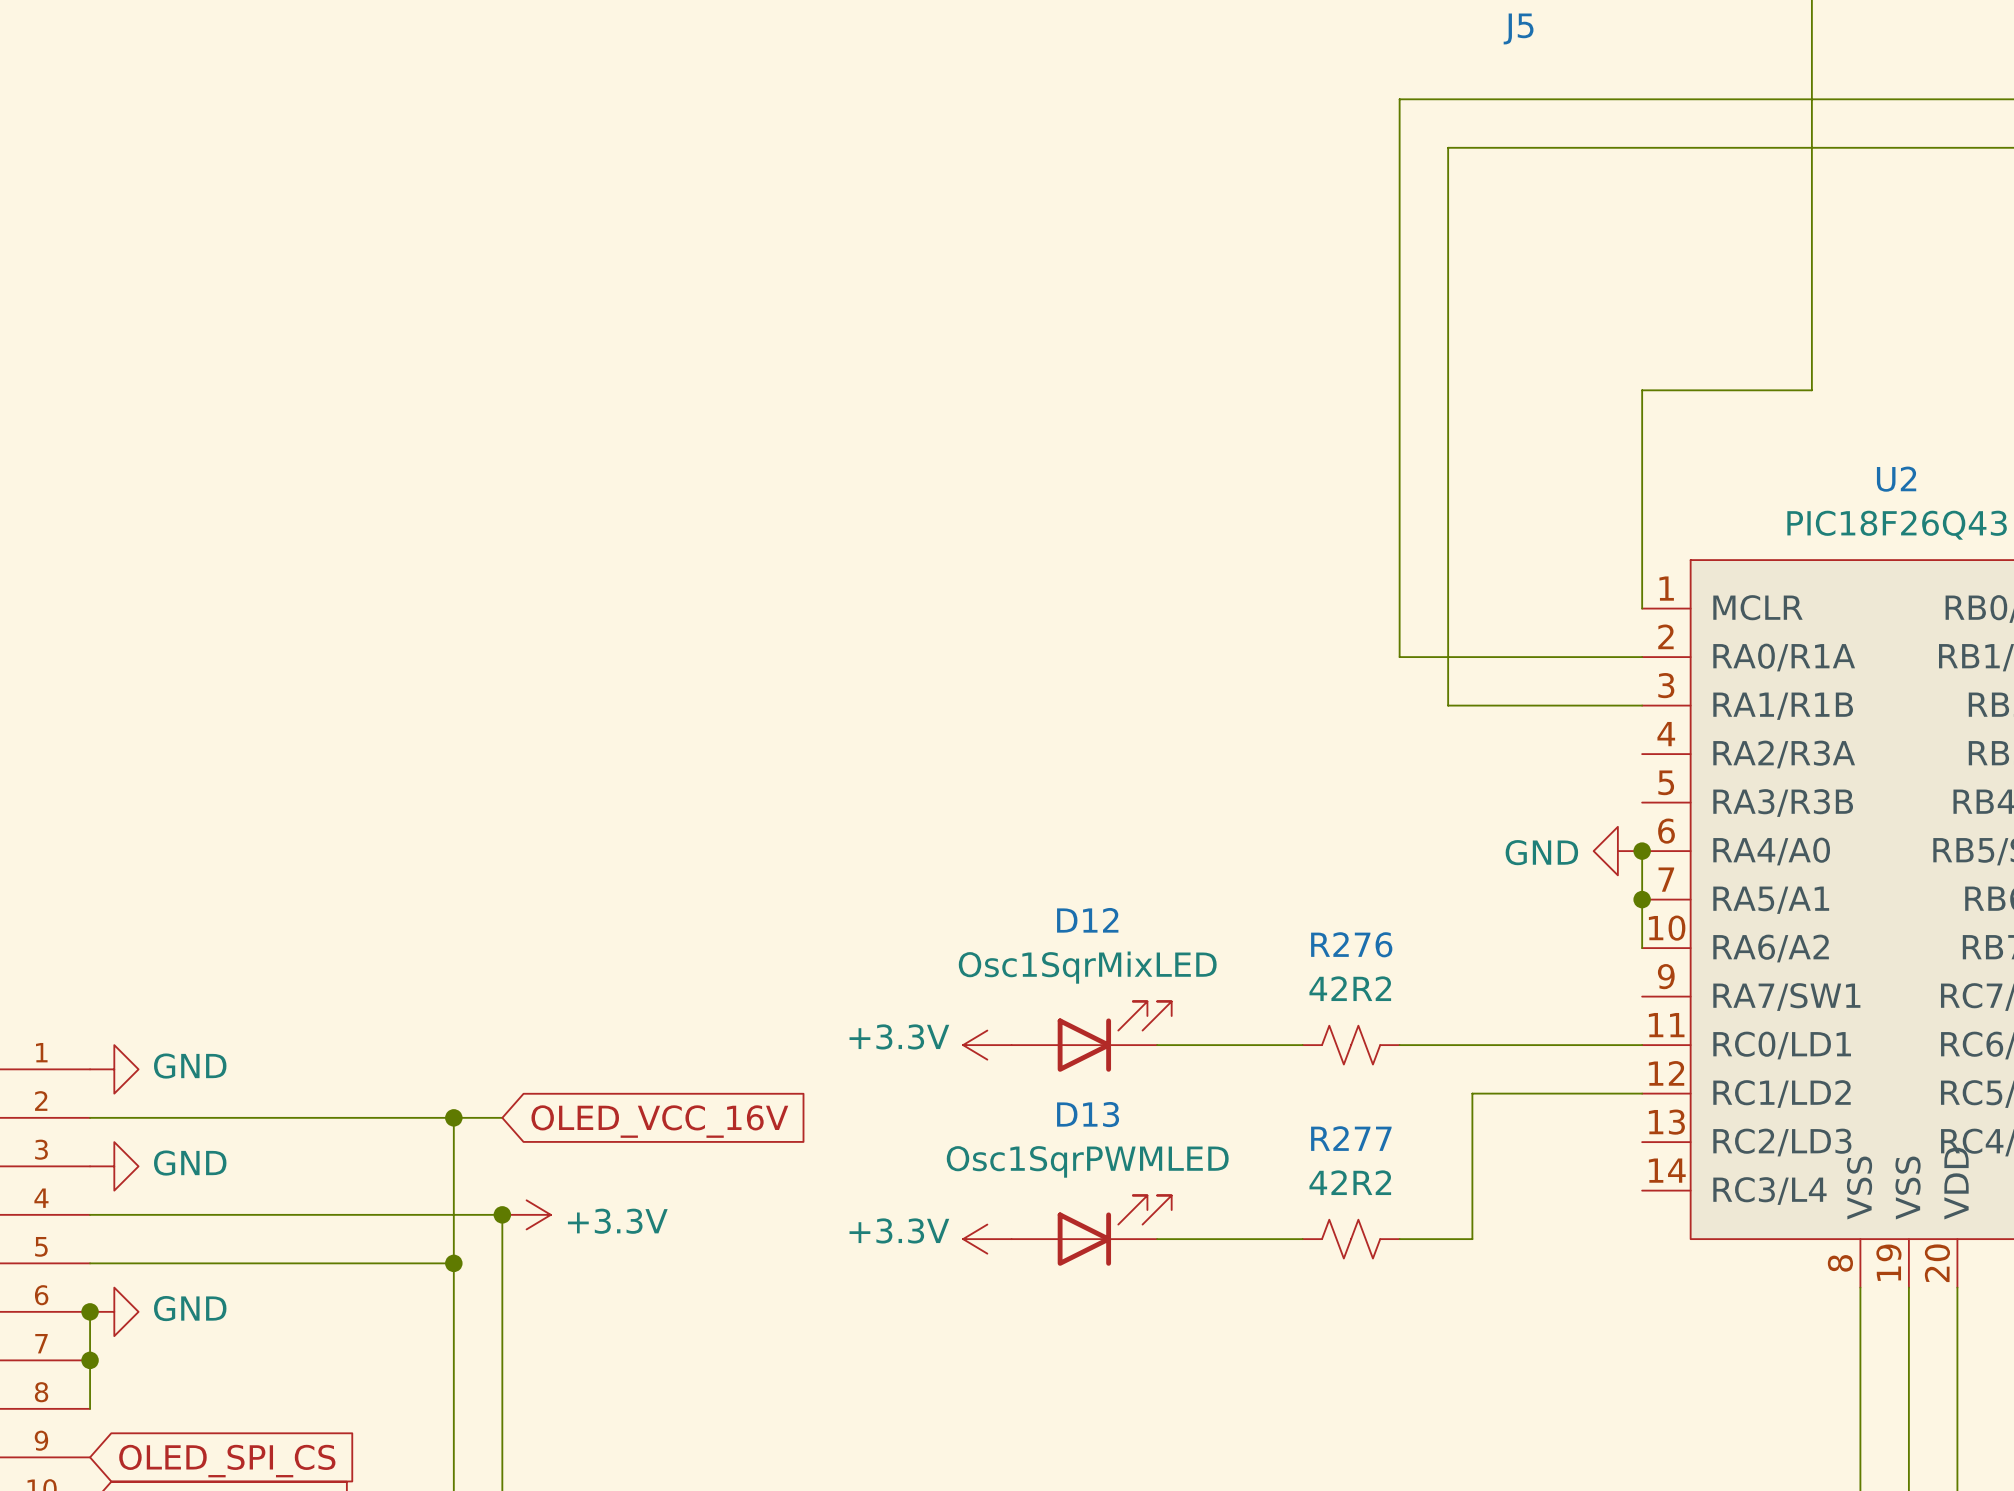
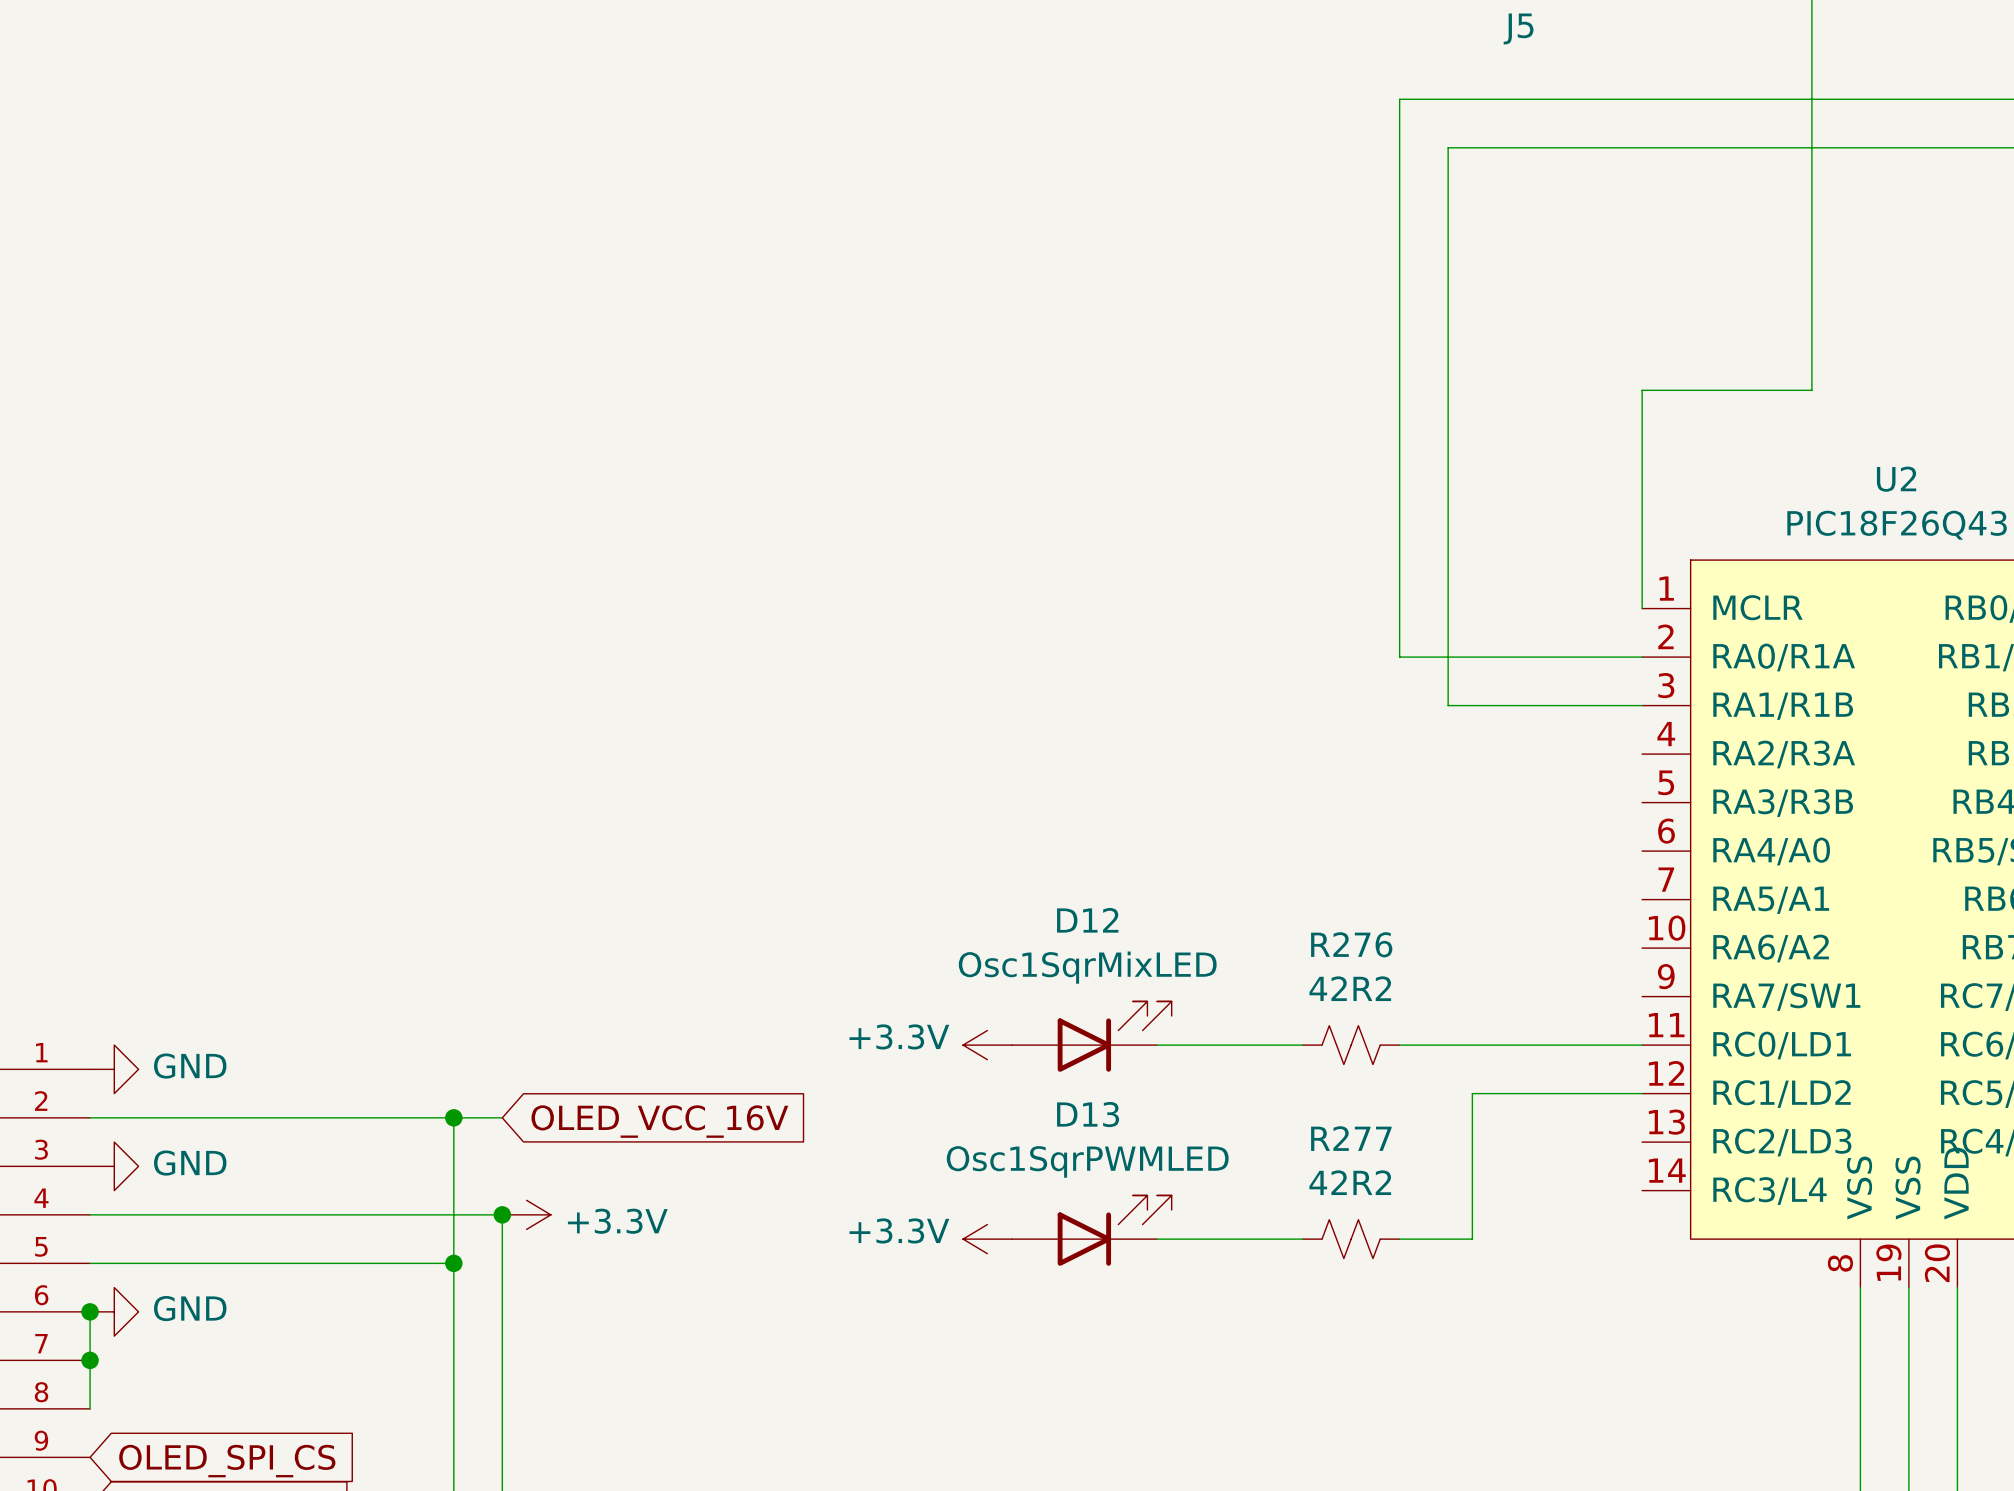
power symbol: GND (1617, 851) -> none
wire: (1642, 851) (1642, 948) -> none
junction: (1642, 851) -> none
junction: (1642, 899) -> none

